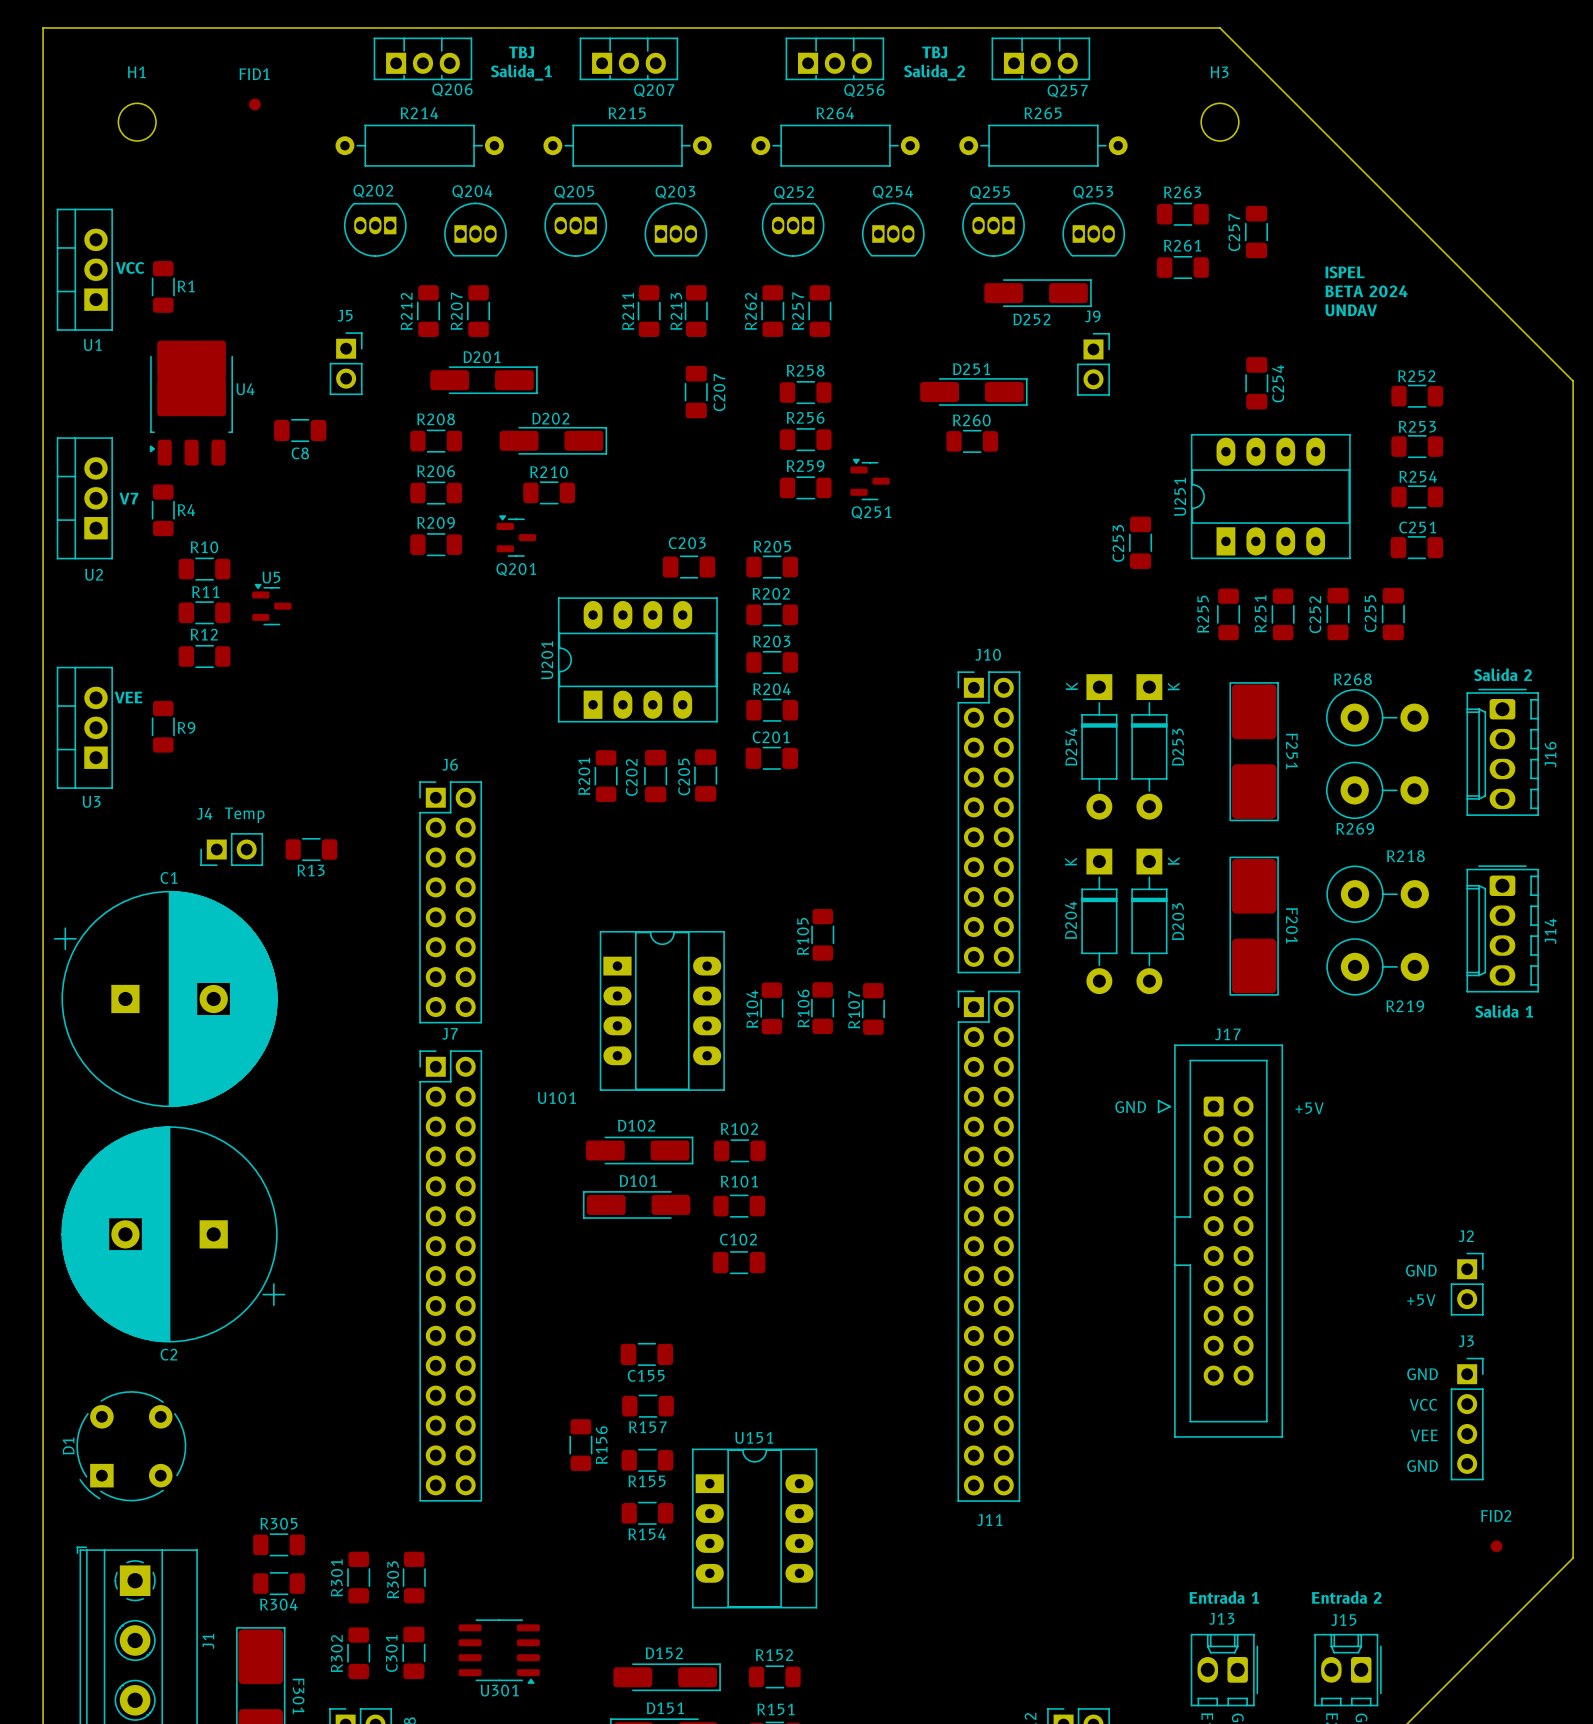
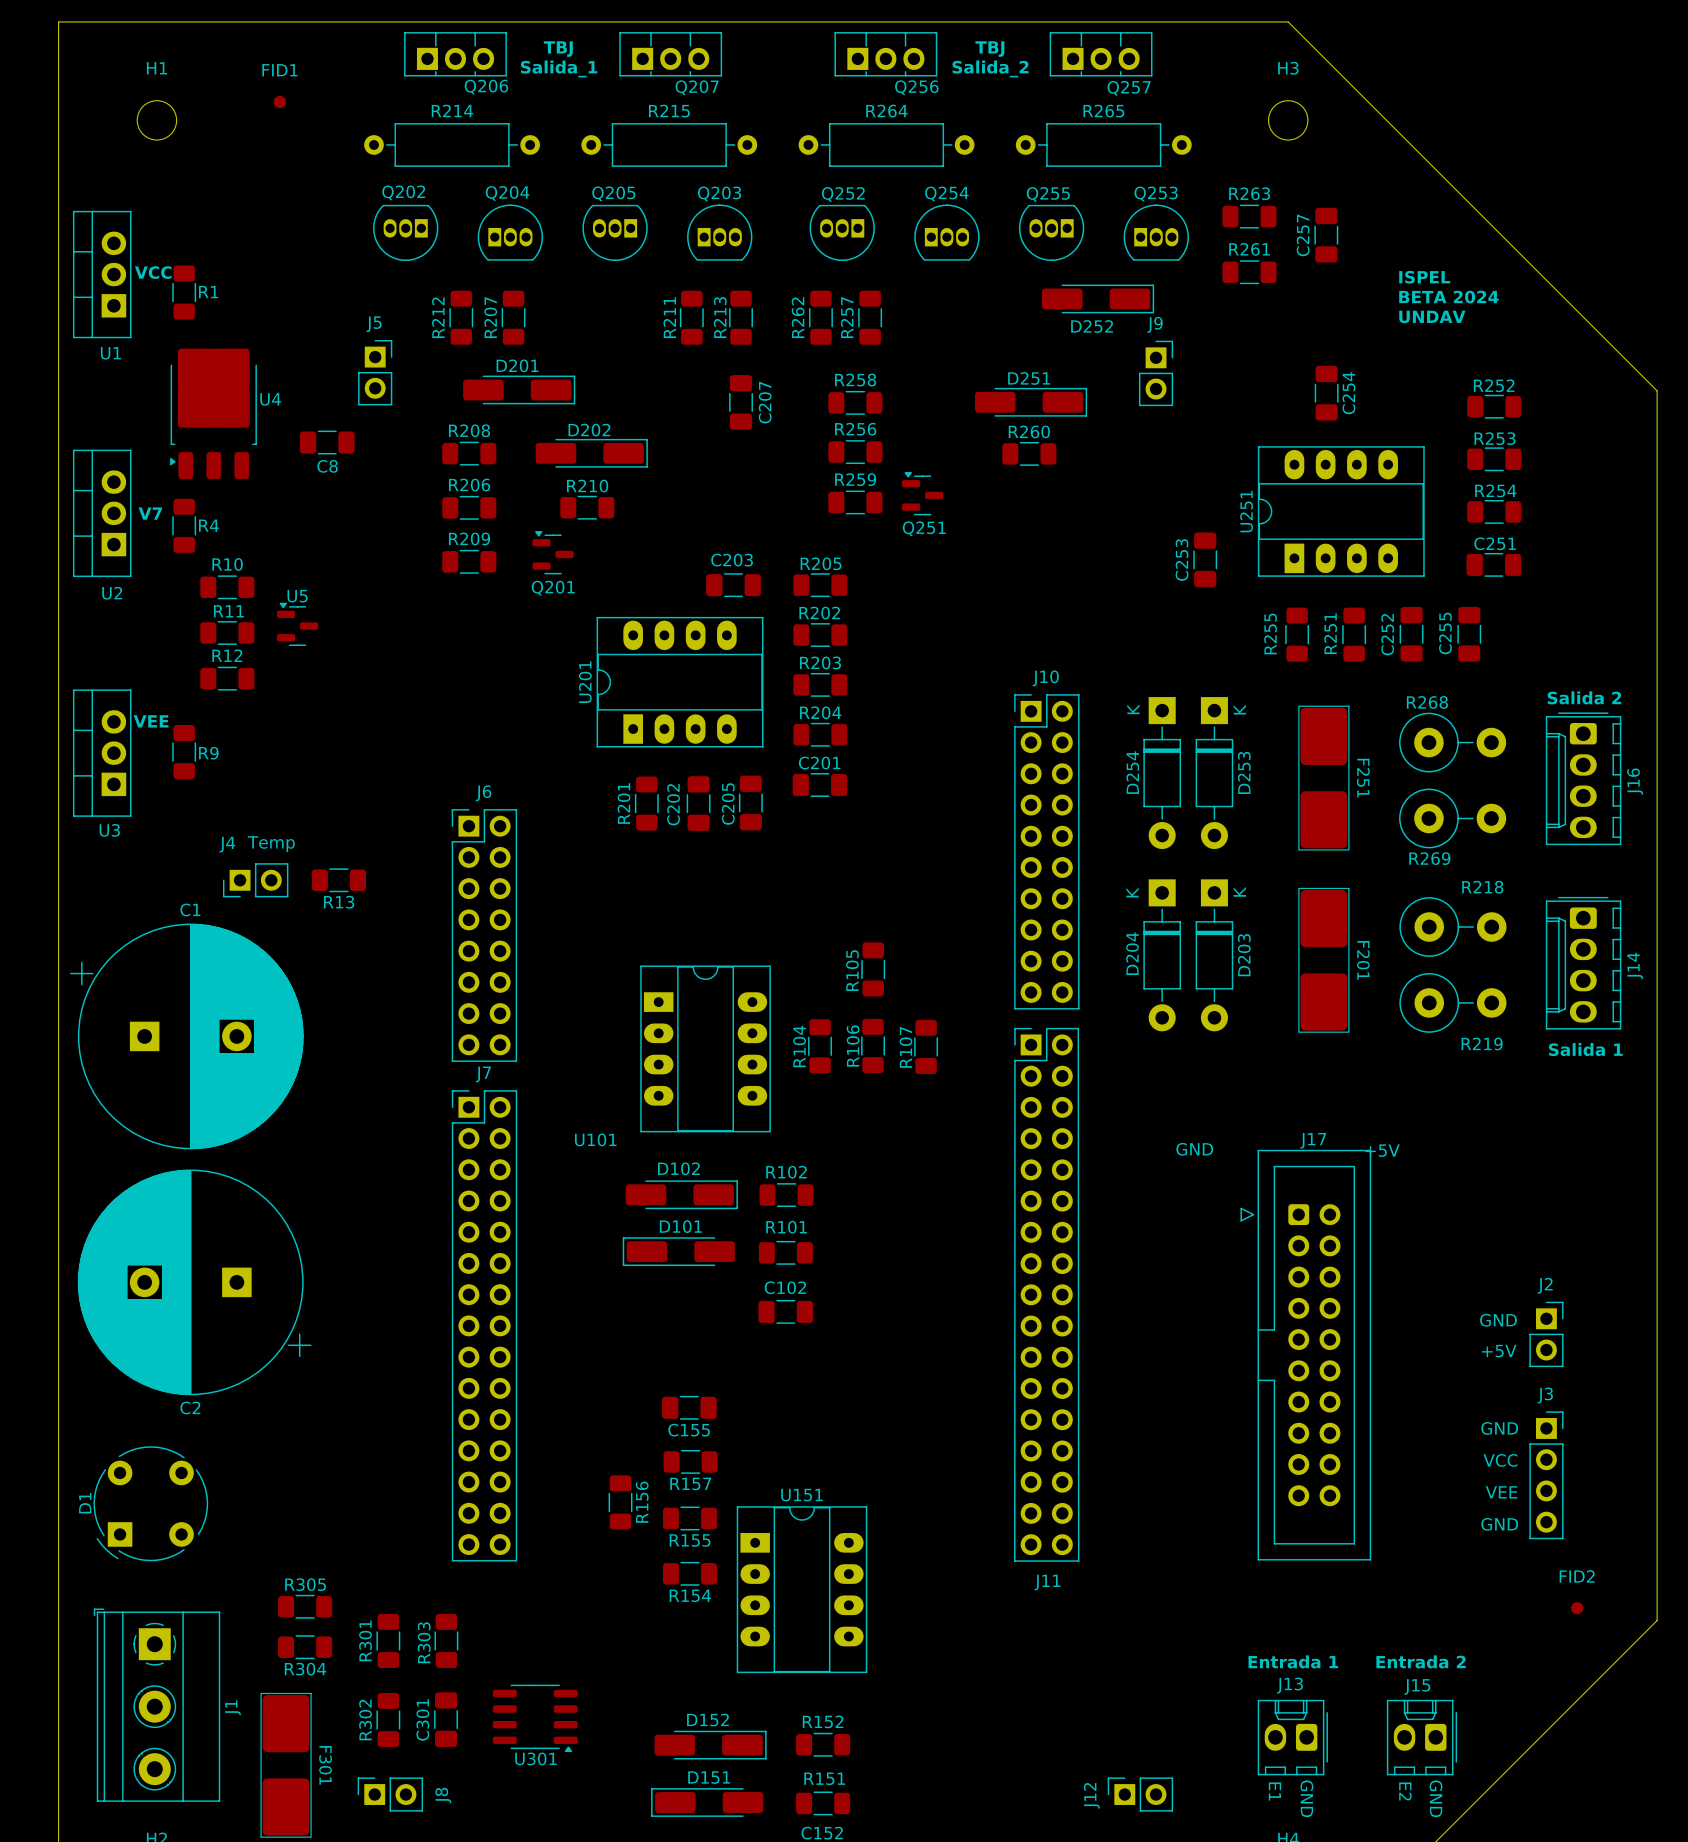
J17 position: (1220, 1241) -> (1305, 1355)

